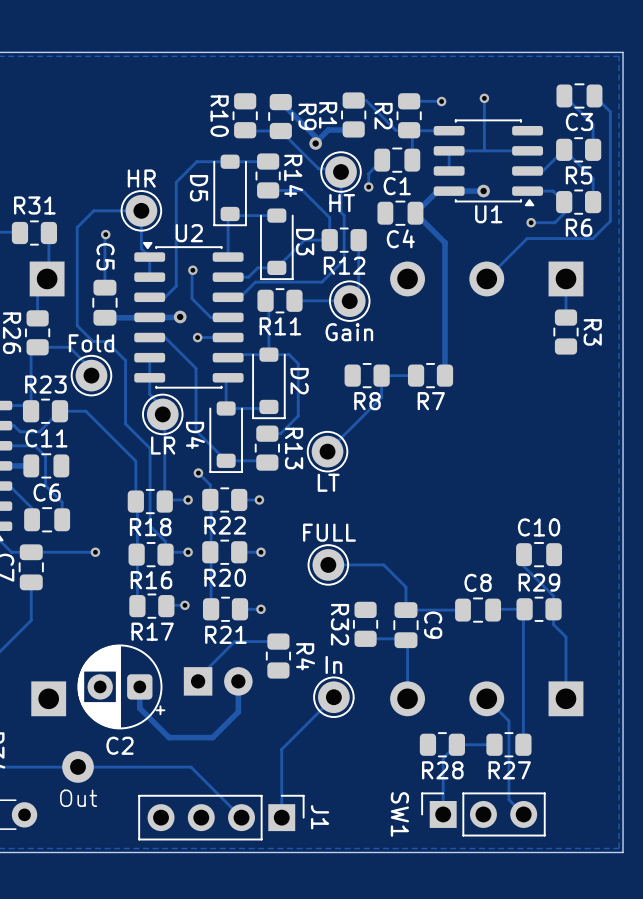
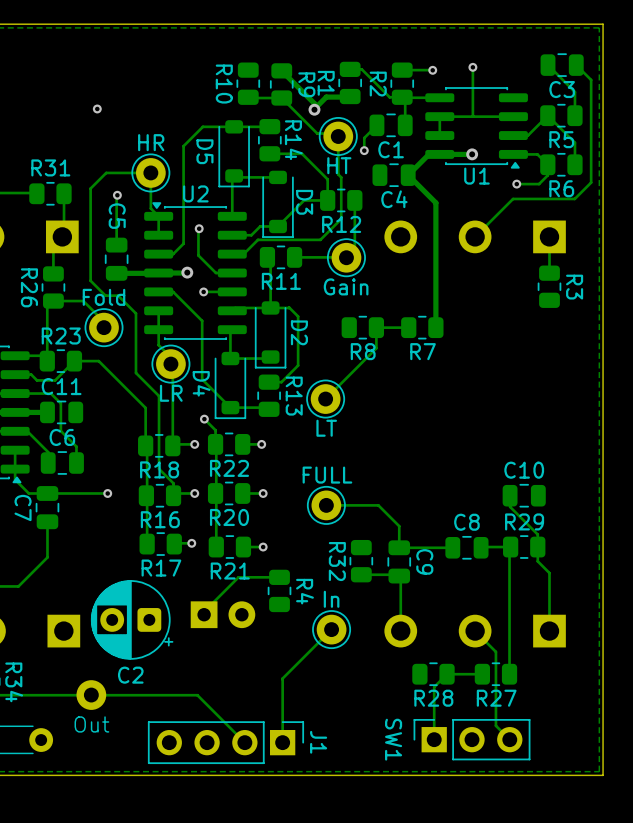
via: none -> (97, 108)
track: (238, 681) (238, 711) (212, 737) (169, 737) (139, 708) (139, 686) -> none

